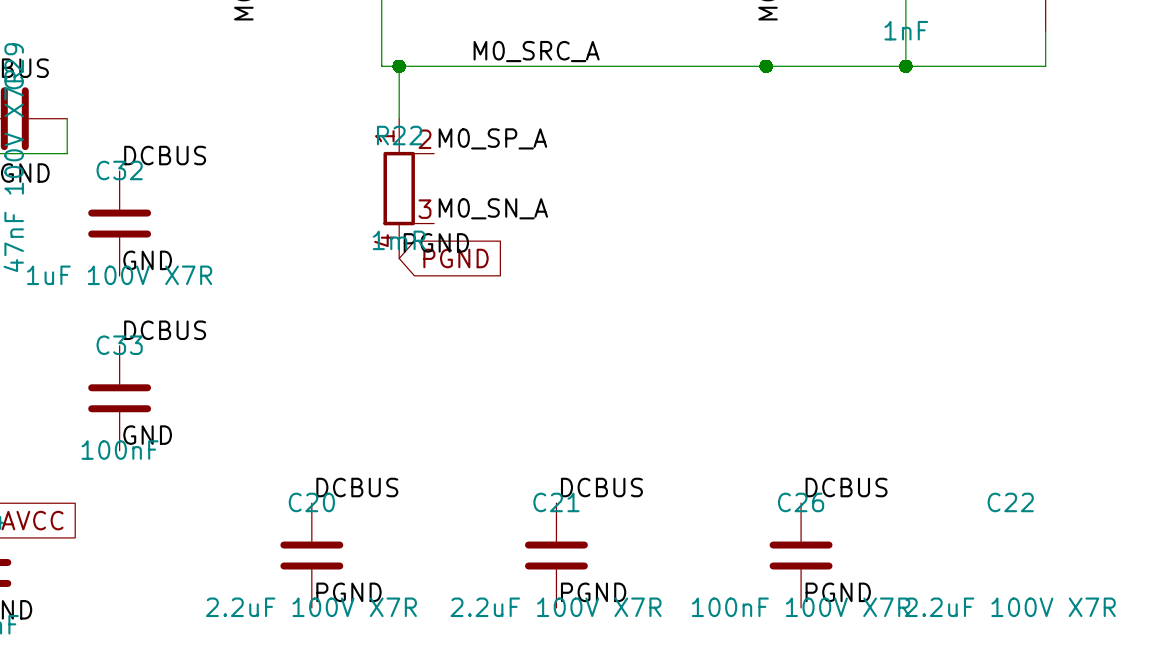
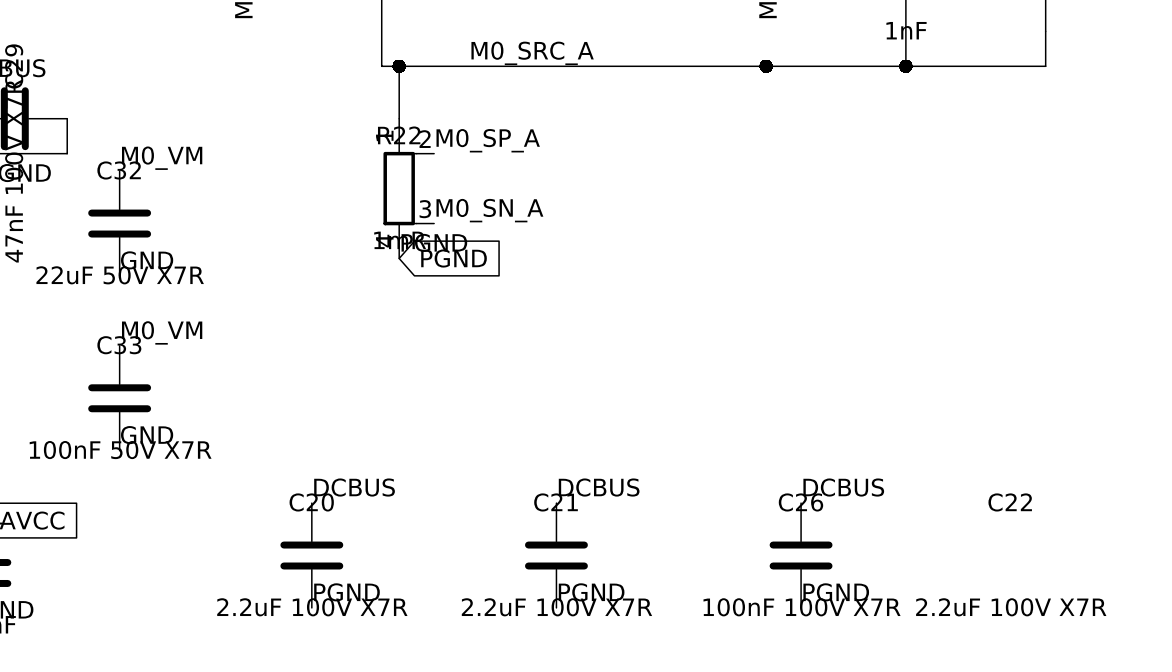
label: DCBUS (165, 155) -> M0_VM (162, 158)
C32 value: 1uF 100V X7R (119, 275) -> 22uF 50V X7R (120, 275)
label: DCBUS (165, 330) -> M0_VM (162, 332)
C33 value: 100nF (120, 450) -> 100nF 50V X7R (120, 450)

